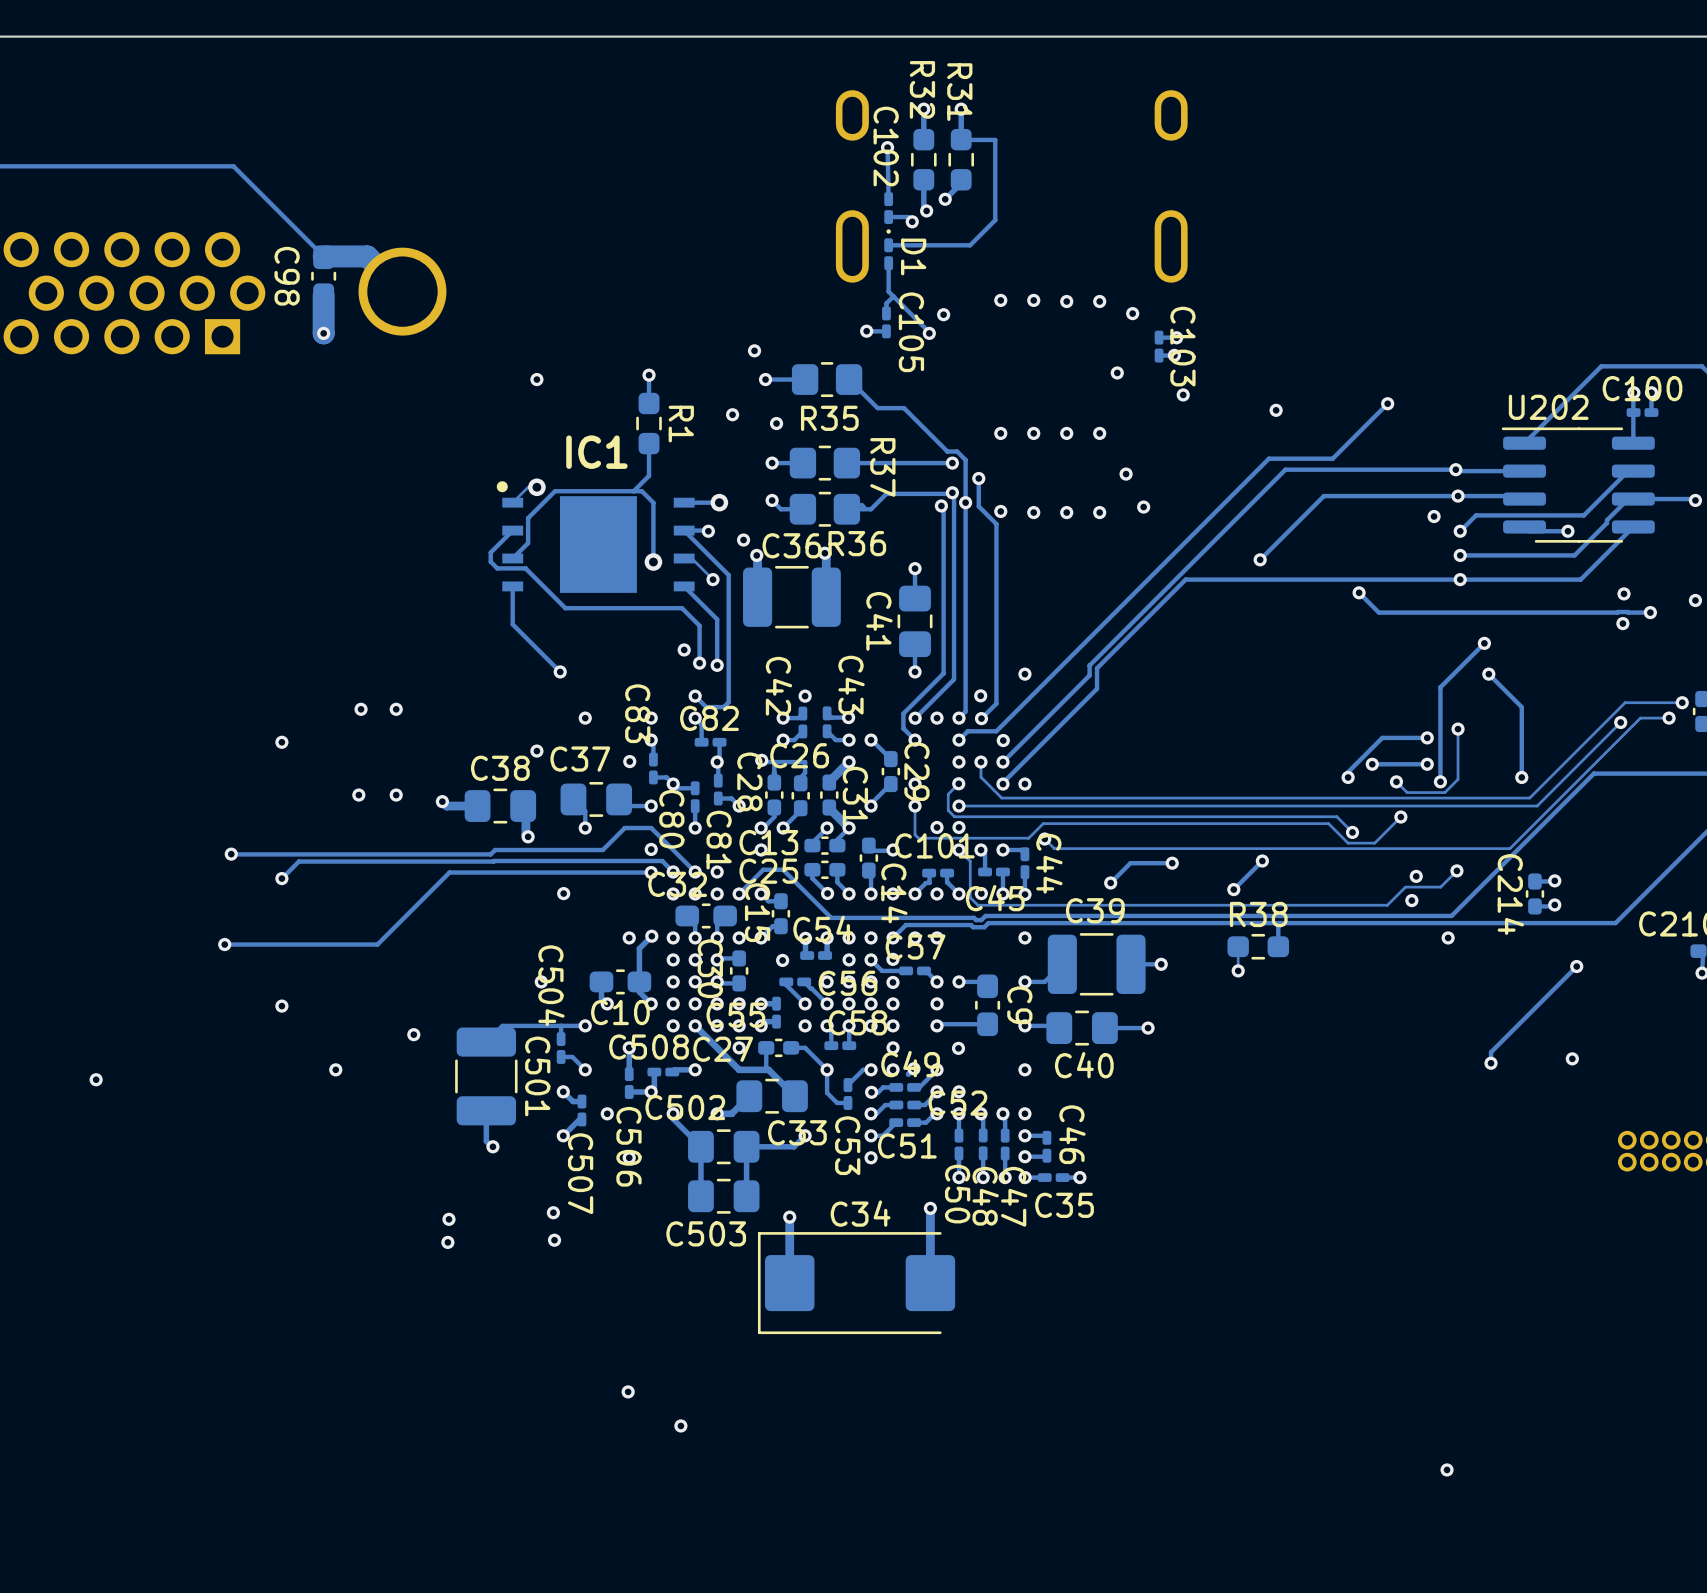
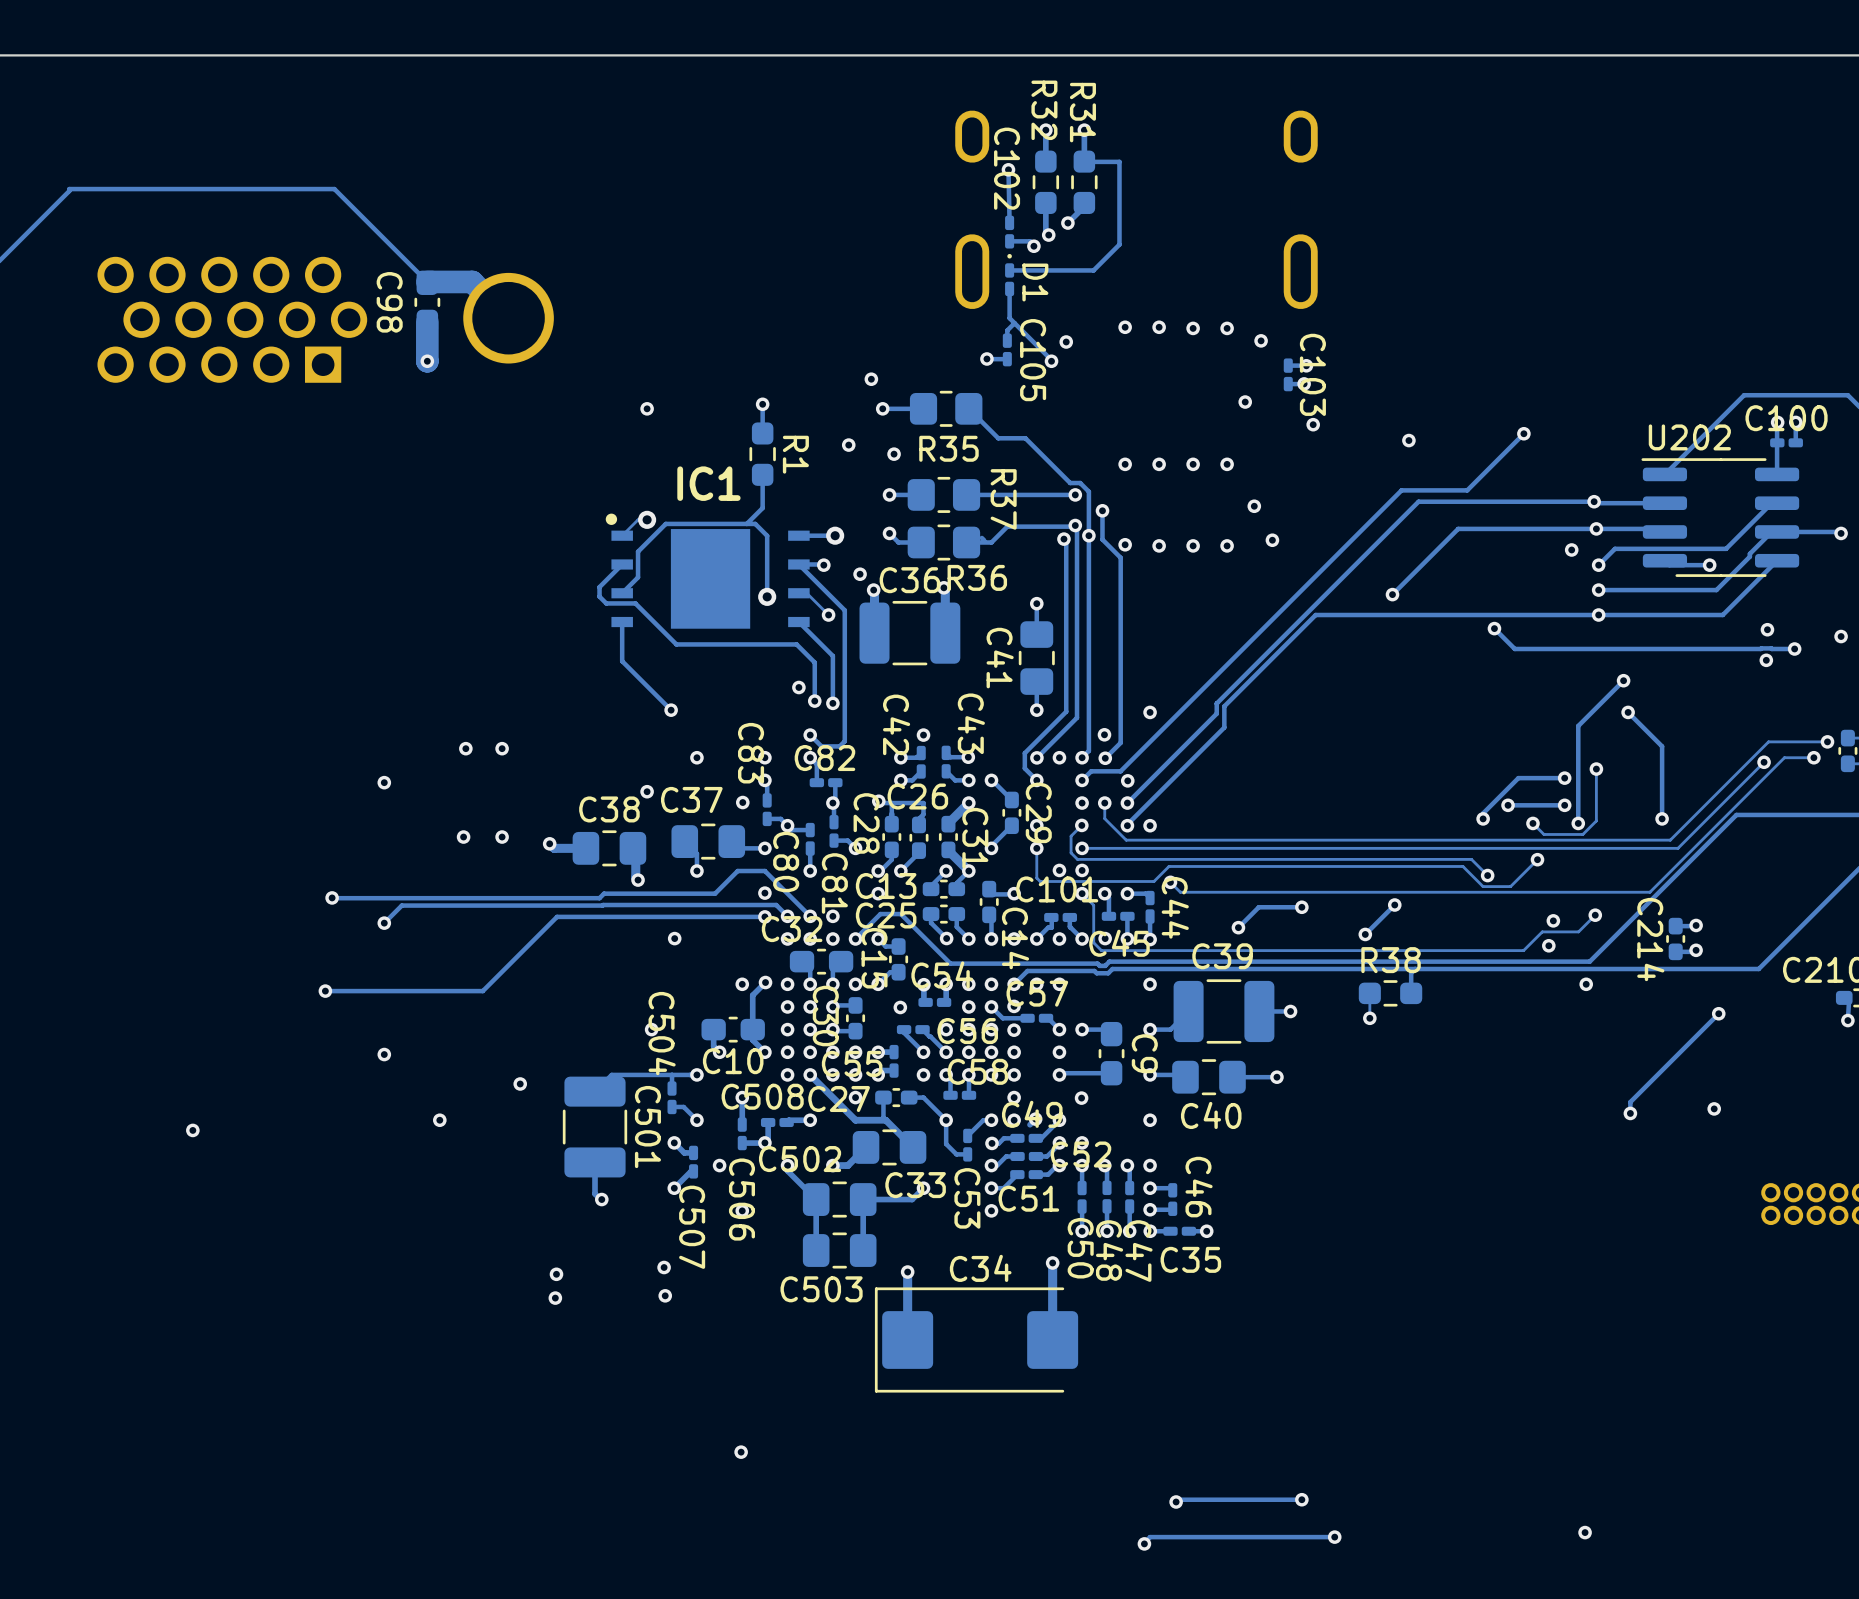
via: (680, 1425) -> none
track: none -> (1301, 1499) (1178, 1499) (1174, 1503)
via: none -> (1301, 1499)
via: none -> (1176, 1501)
track: none -> (1334, 1537) (1150, 1537) (1143, 1543)
via: none -> (1334, 1537)
via: none -> (1144, 1543)

